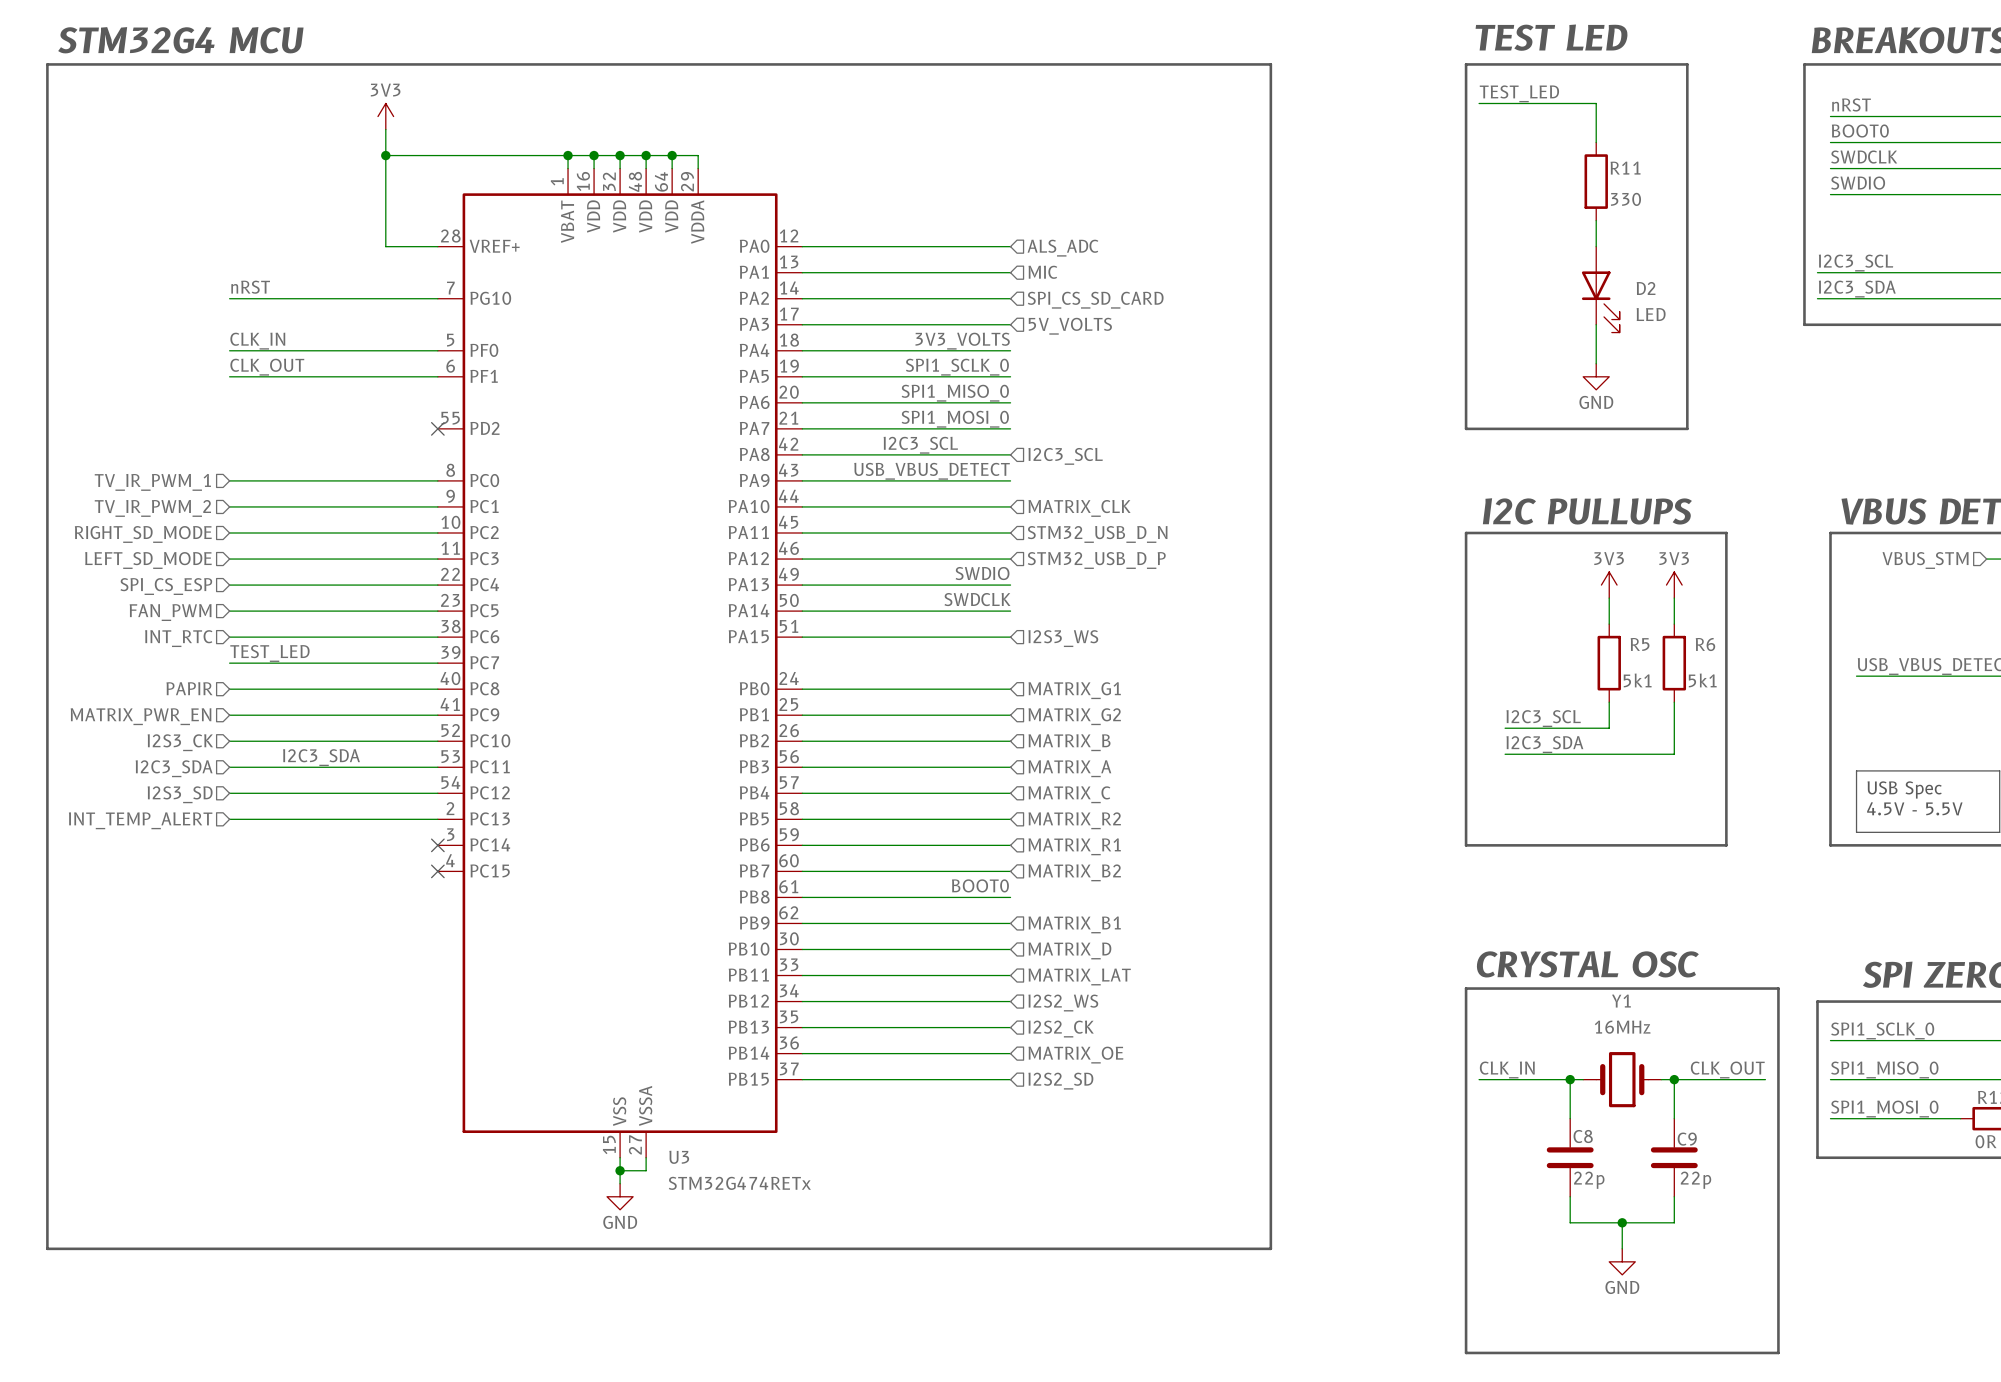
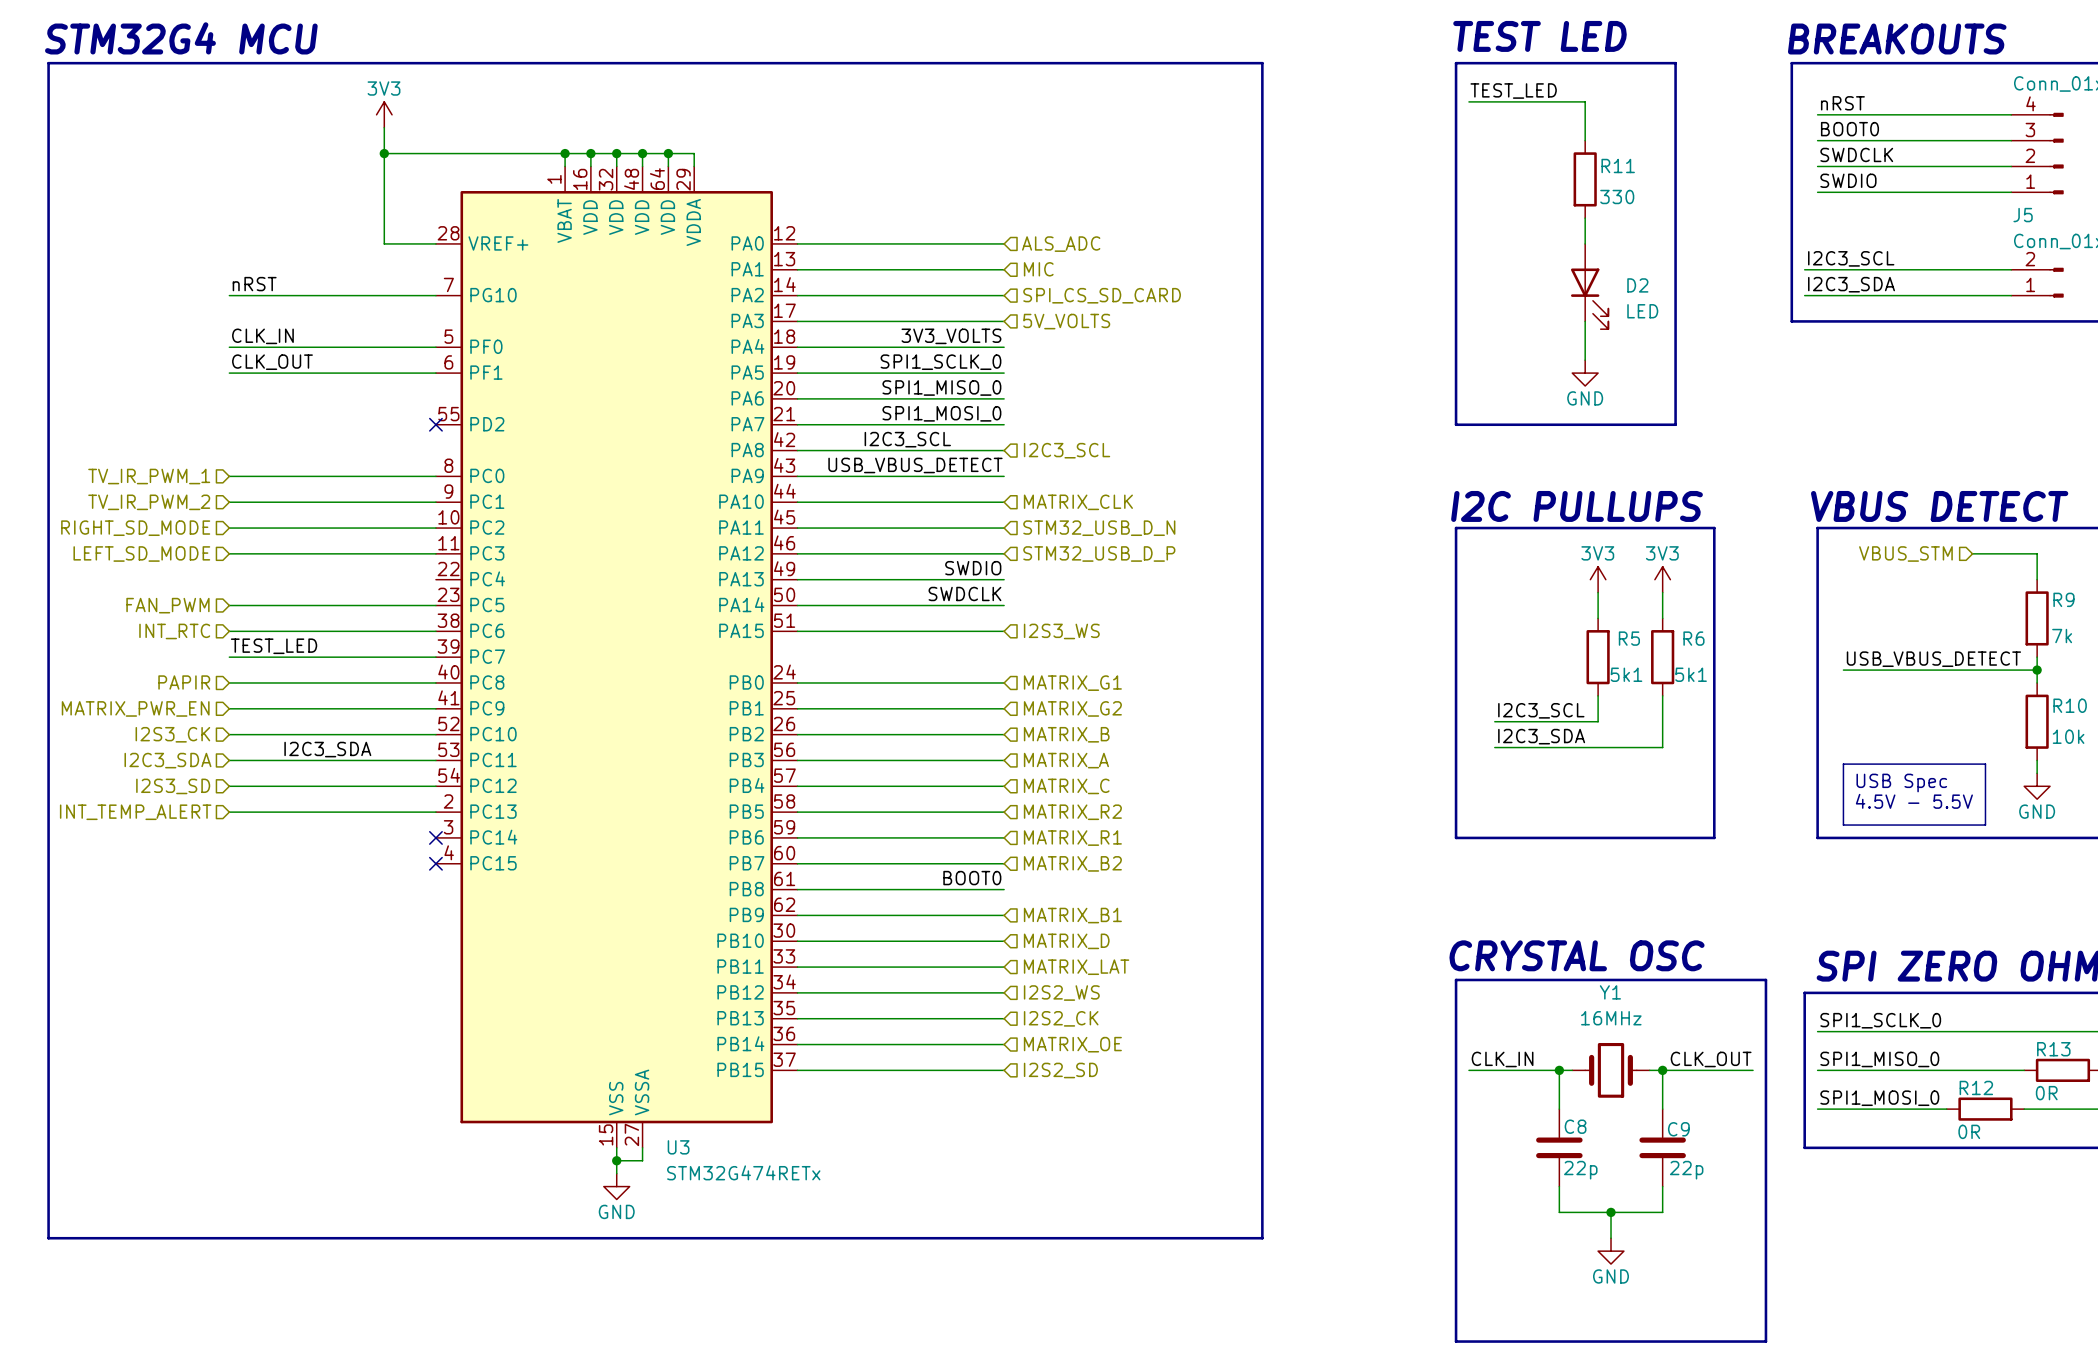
wire: (229, 585) (437, 585) -> none
hierarchical label: SPI_CS_ESP (166, 586) -> none

